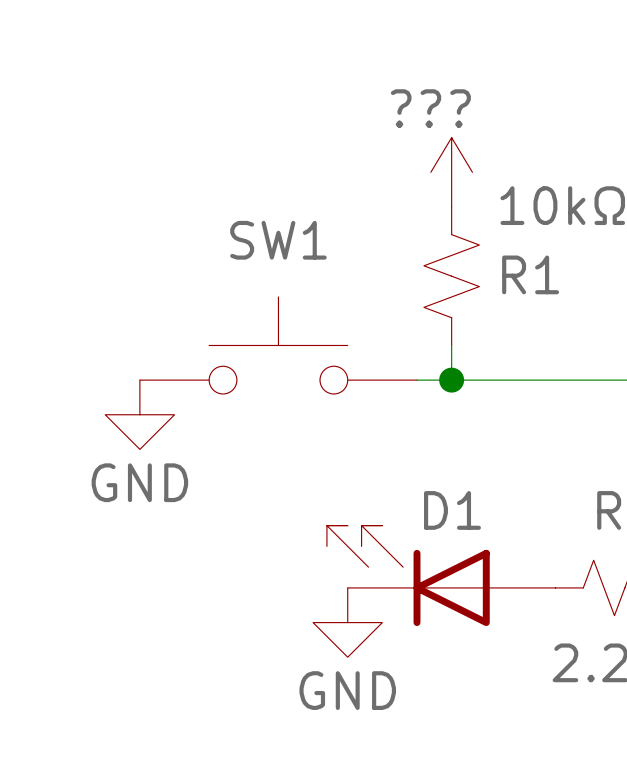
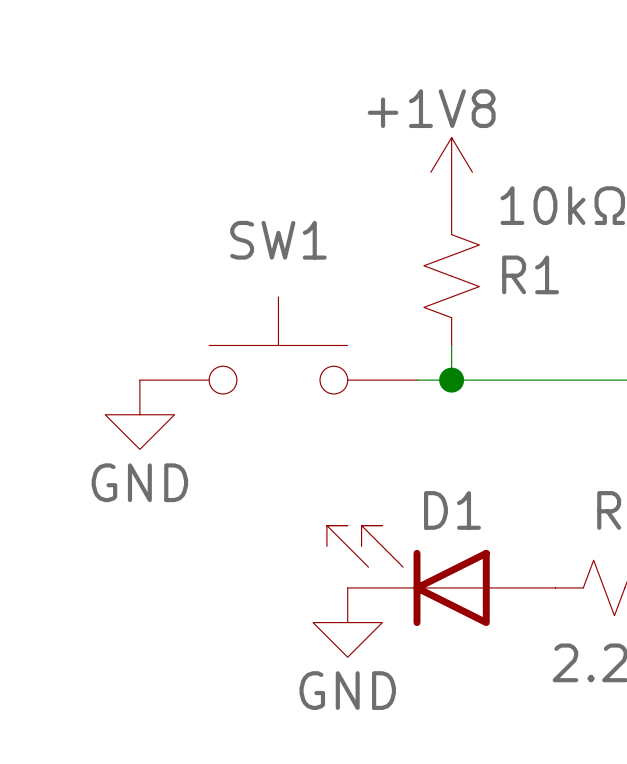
power symbol: ??? (451, 172) -> +1V8 (451, 172)

